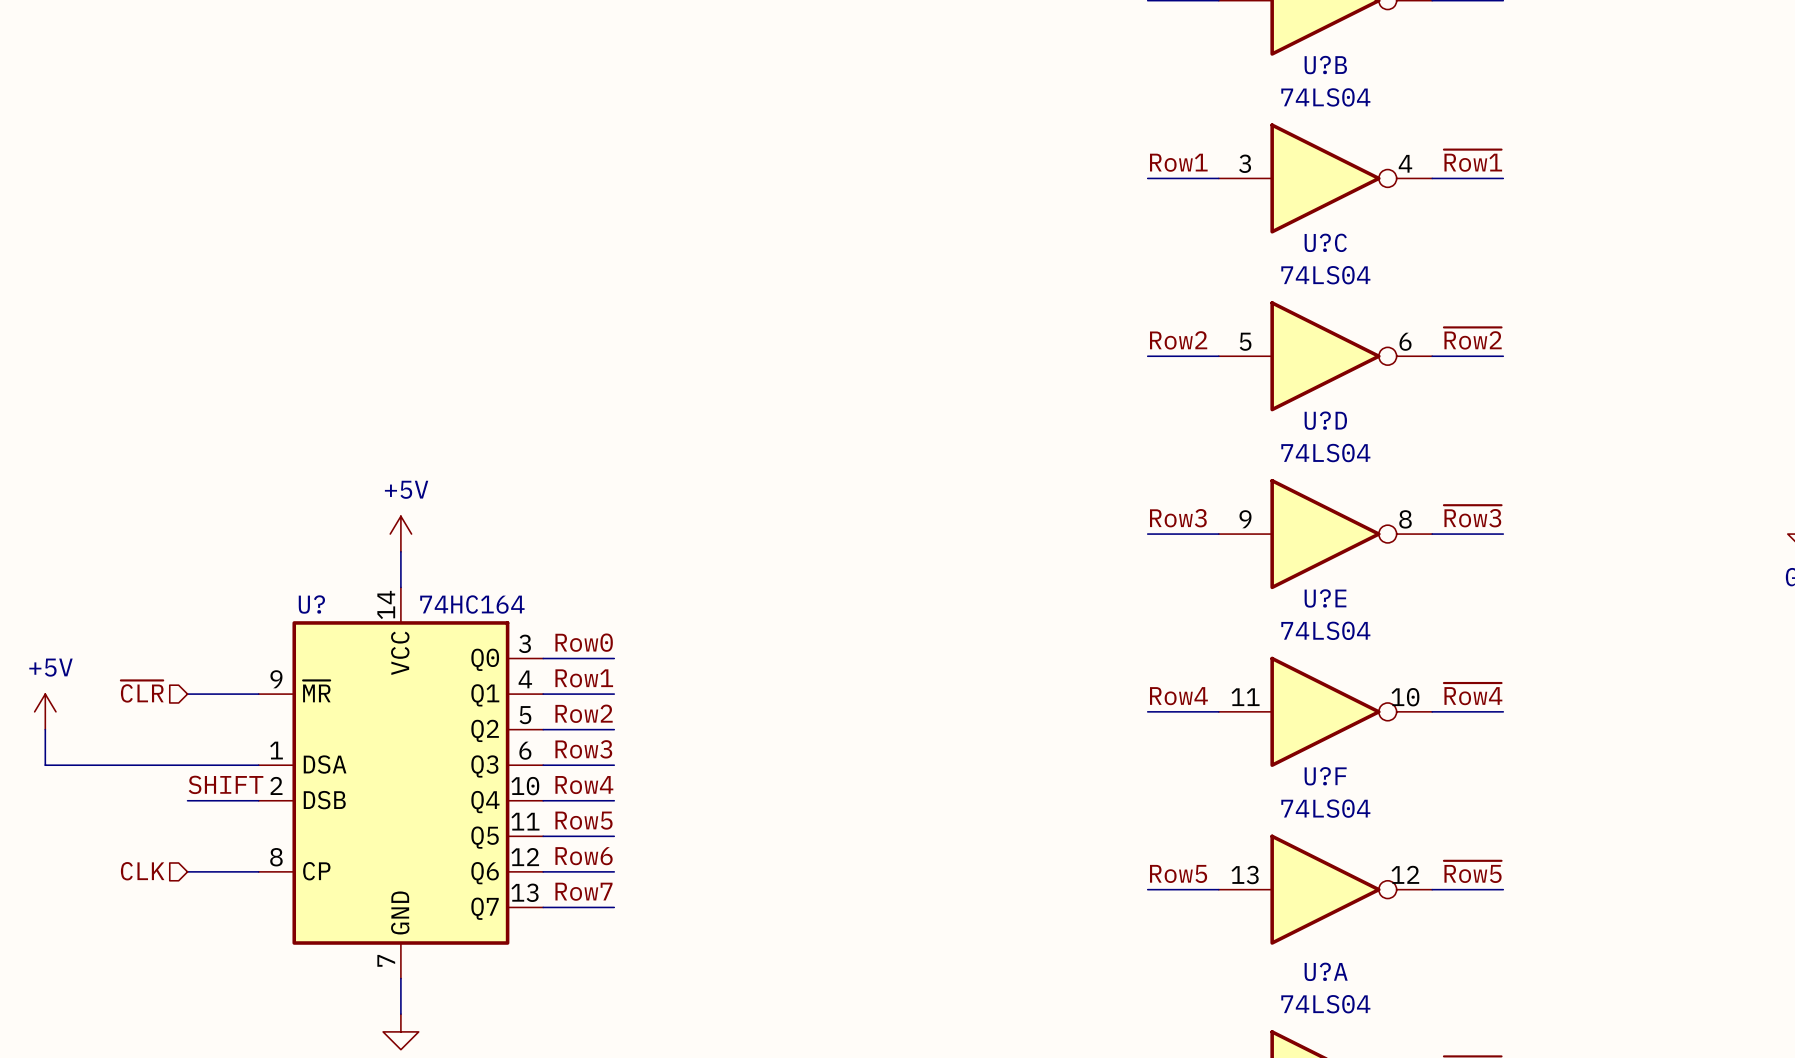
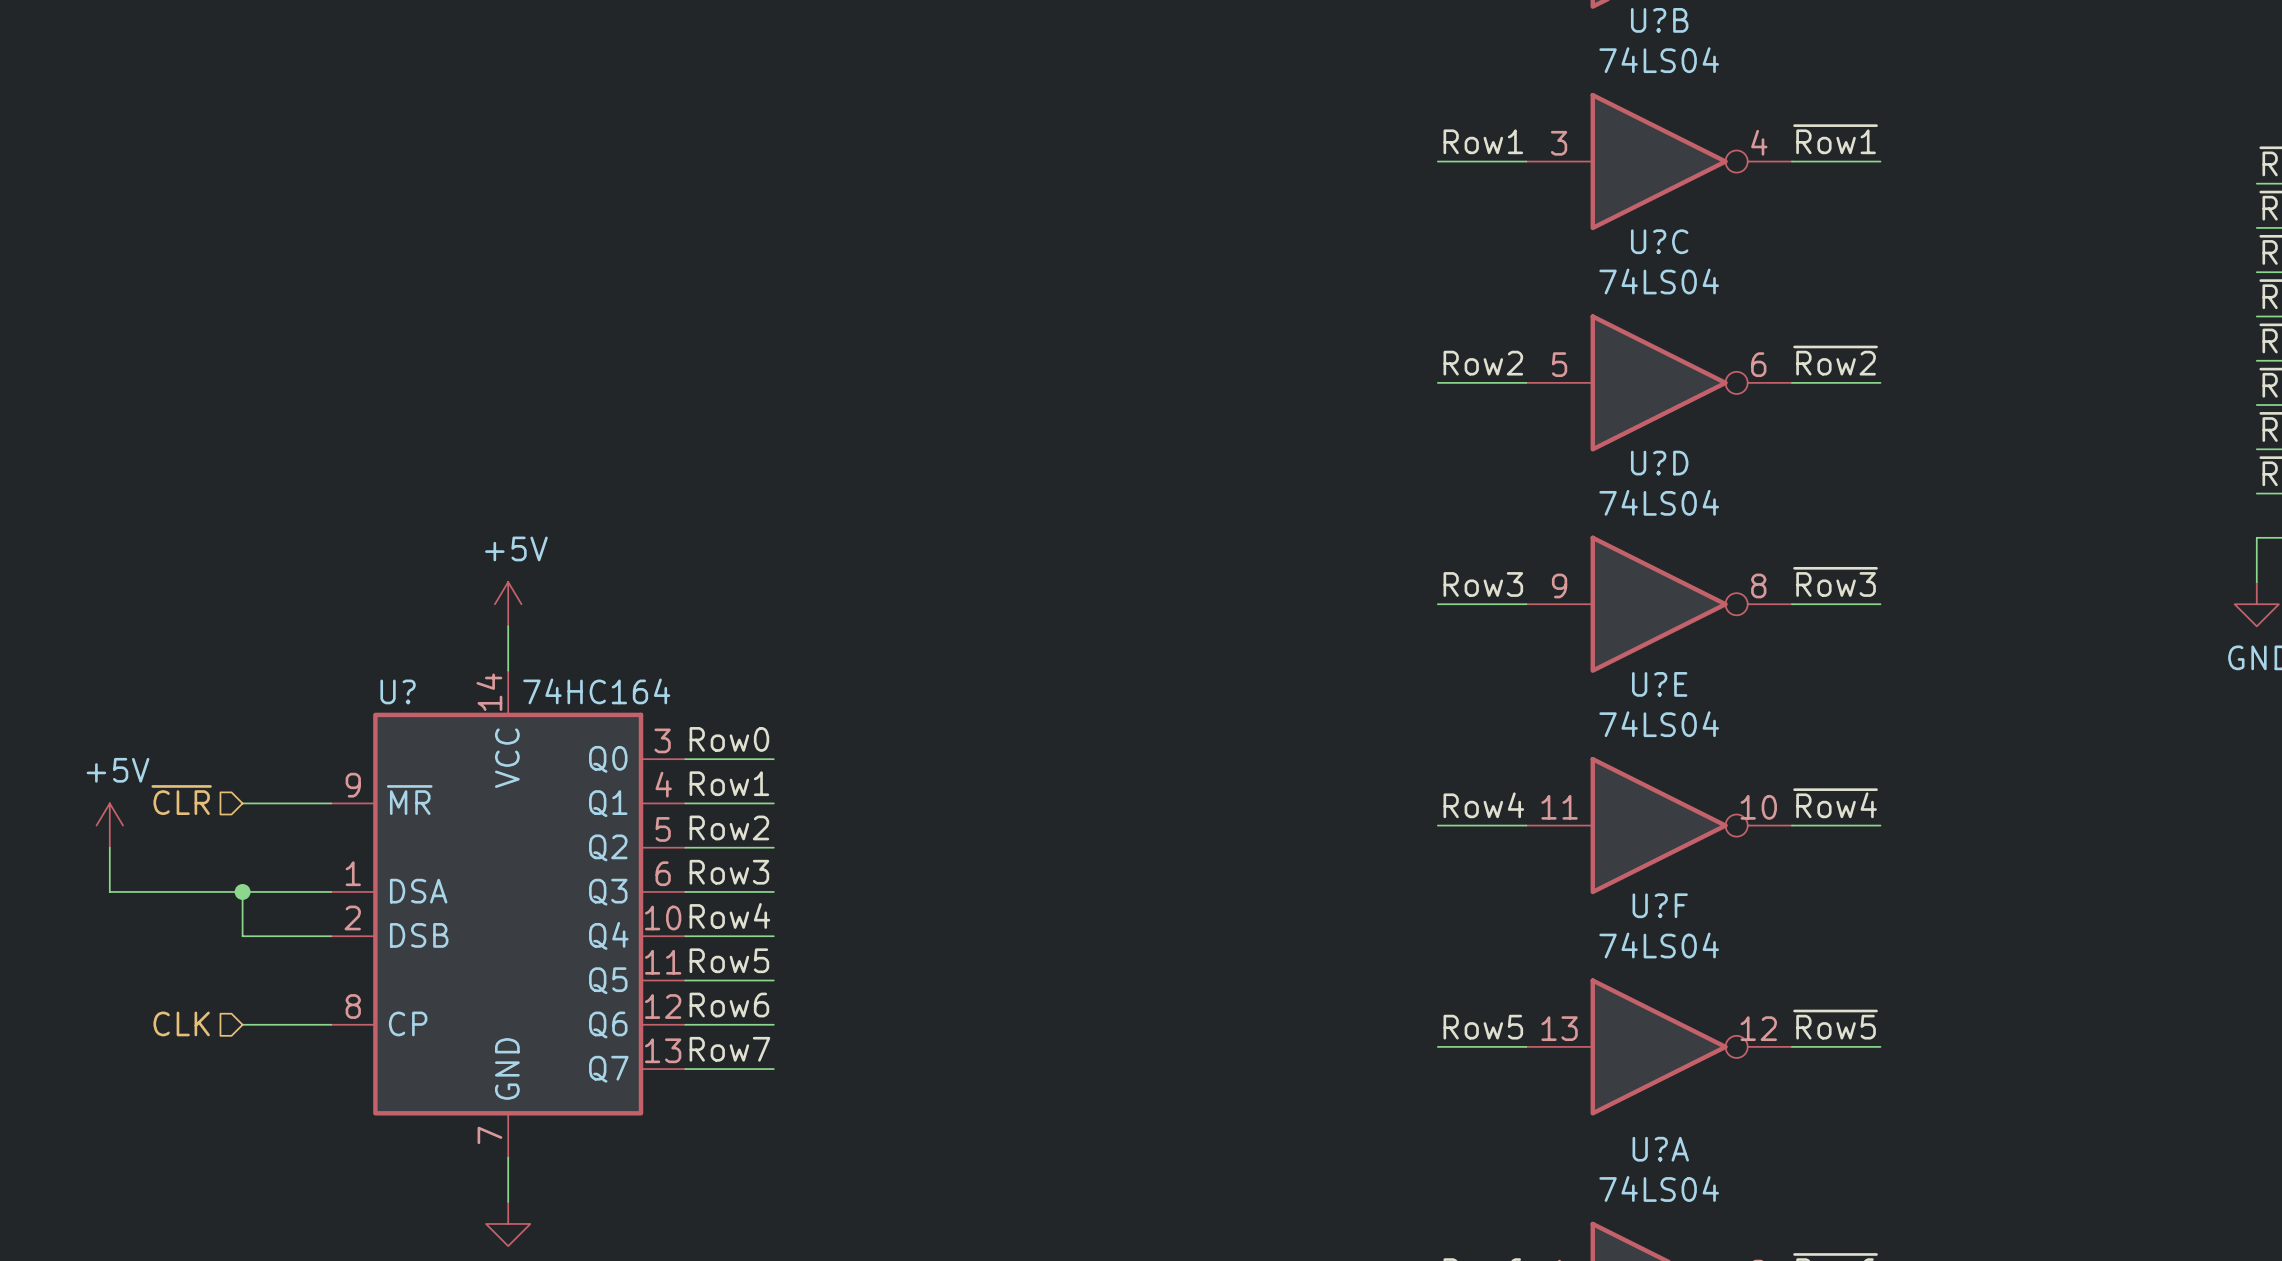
power symbol position: +5V (45, 711) -> +5V (109, 825)
wire: (45, 729) (45, 765) (80, 765) -> (109, 847) (109, 891)
wire: none -> (242, 891) (242, 936)
junction: none -> (242, 891)
label: SHIFT (226, 784) -> none

